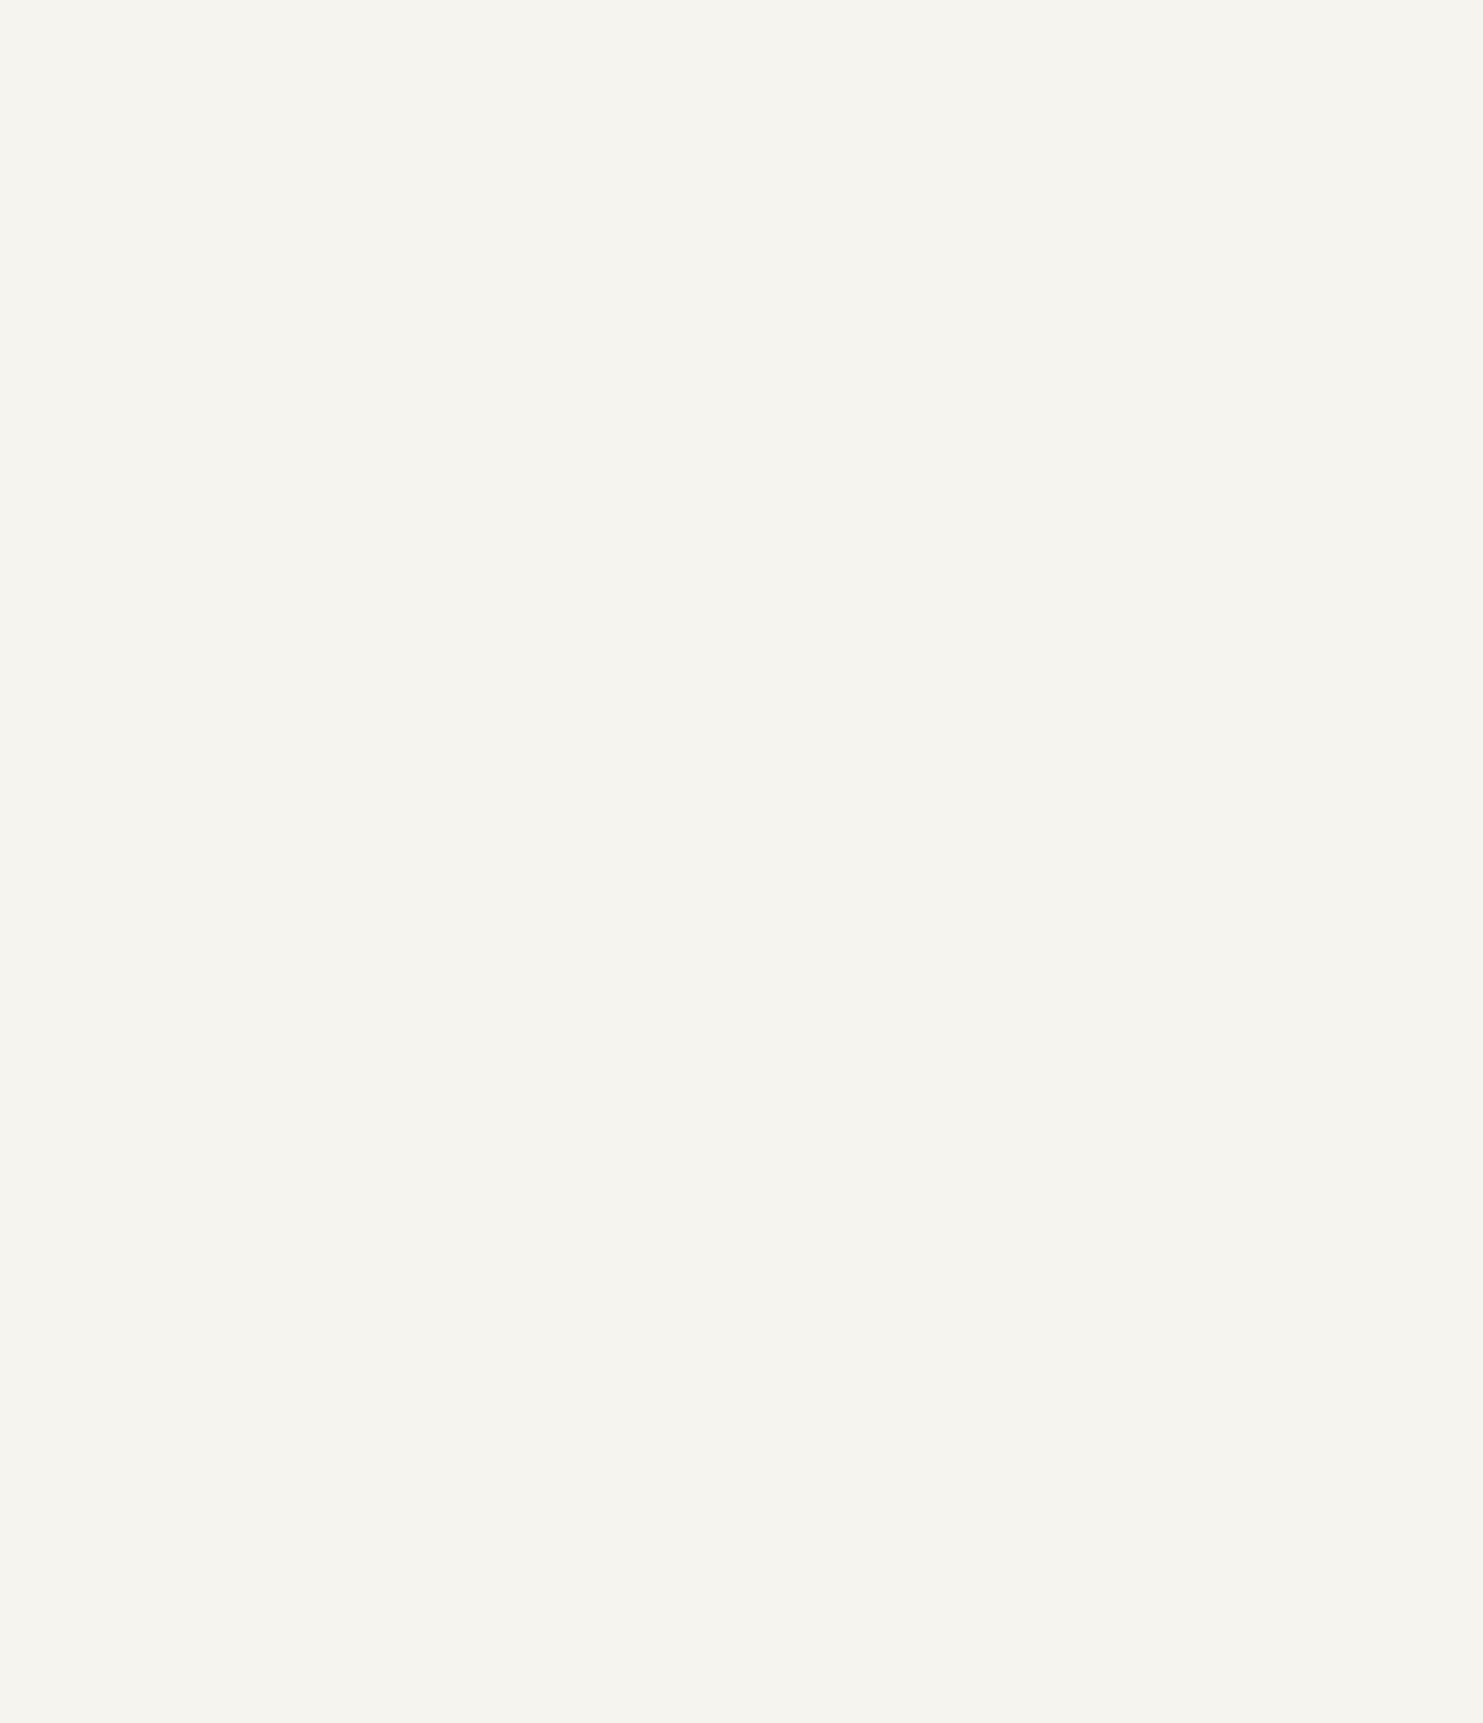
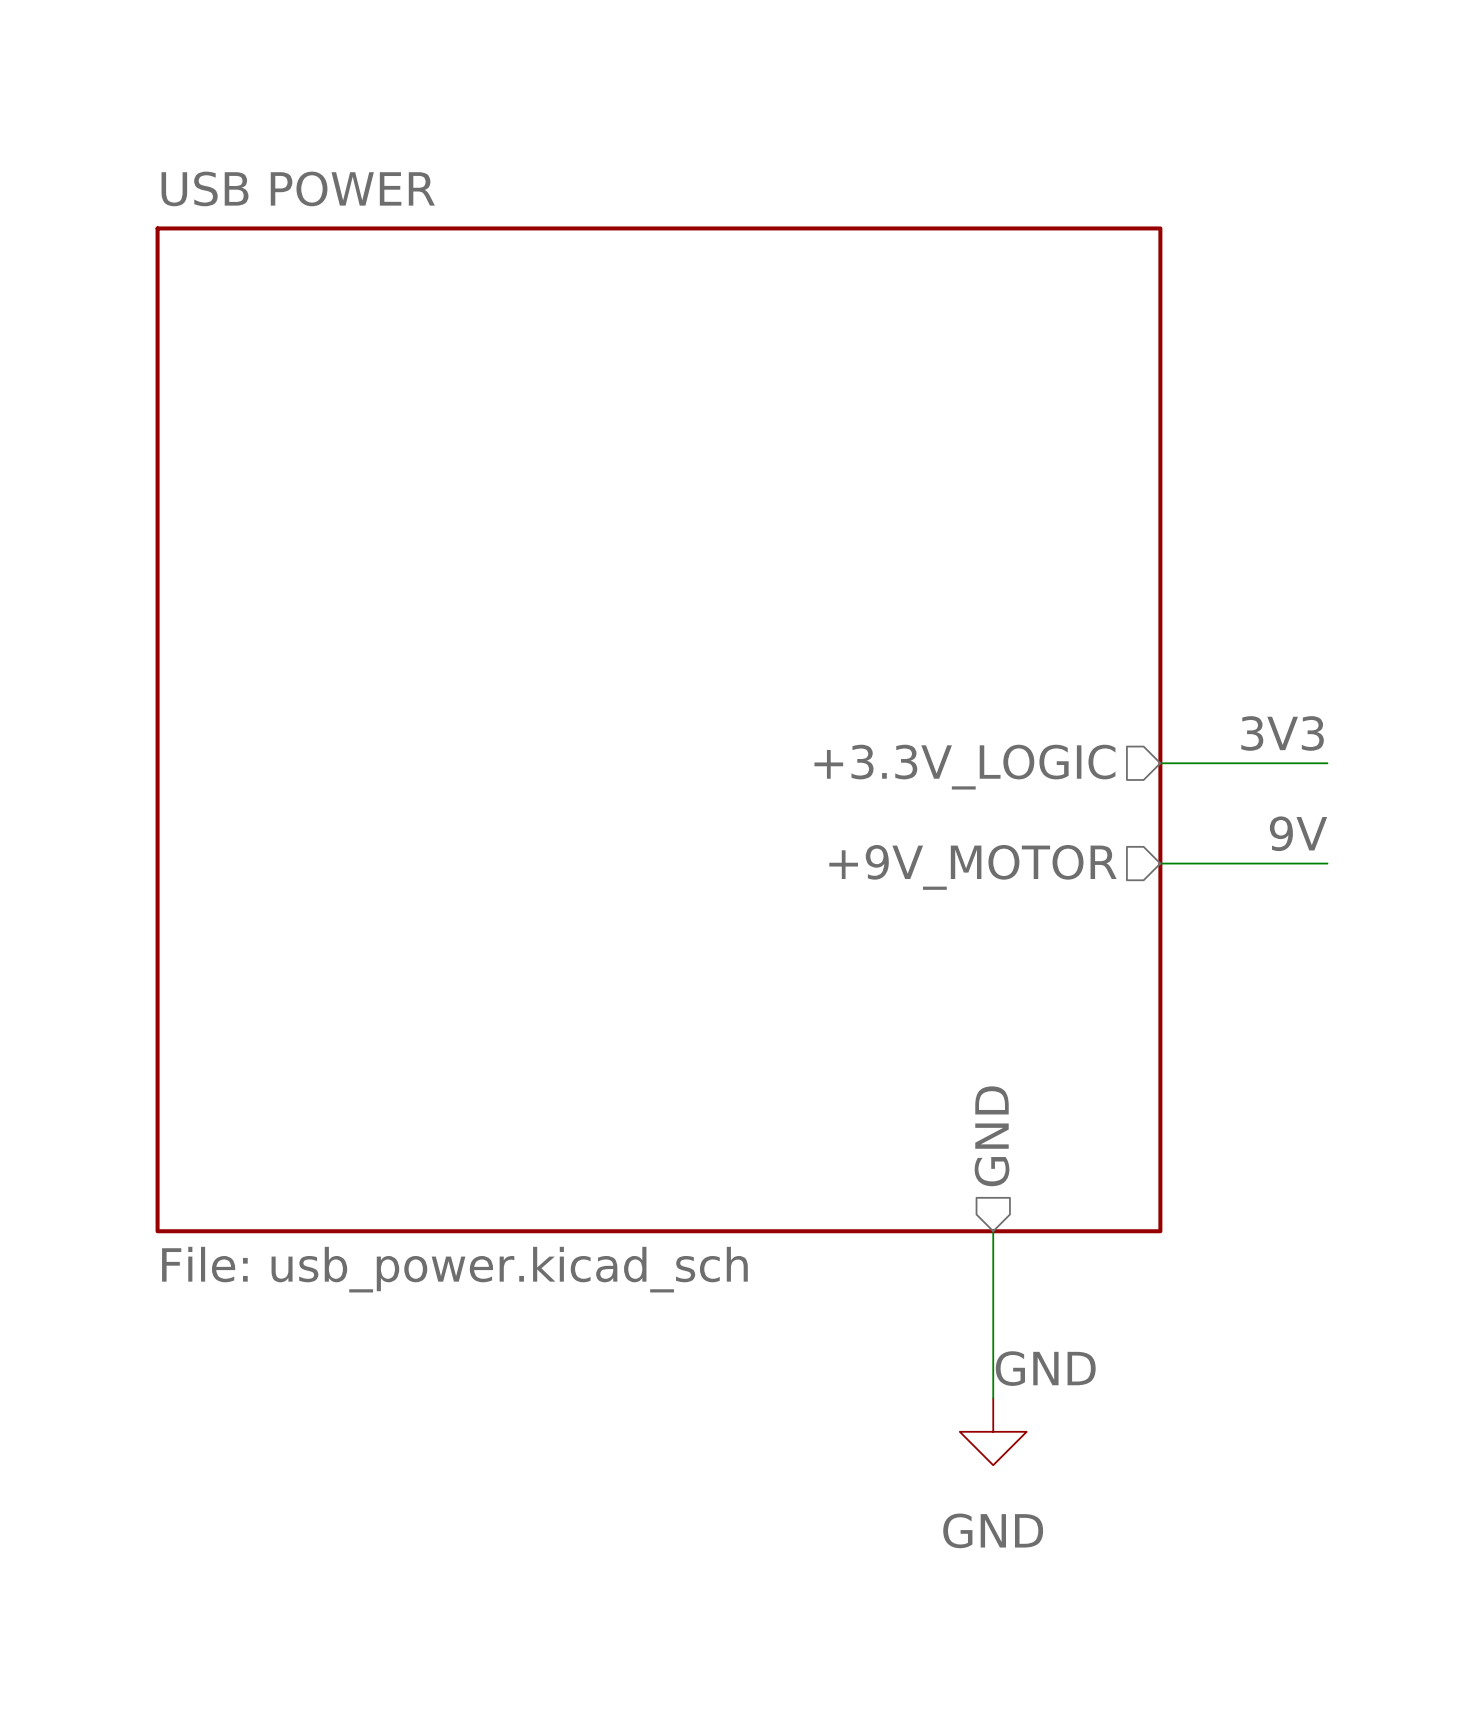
sheet USB POWER: none -> File: usb_power.kicad_sch (658, 729)
label: none -> 3V3 (1282, 733)
wire: none -> (1160, 763) (1327, 763)
sheet pin: none -> +3.3V_LOGIC (964, 767)
label: none -> 9V (1298, 833)
wire: none -> (1160, 863) (1327, 863)
sheet pin: none -> +9V_MOTOR (972, 867)
sheet pin: none -> GND (992, 1136)
wire: none -> (993, 1231) (993, 1398)
label: none -> GND (1045, 1368)
power symbol: none -> GND (993, 1431)

